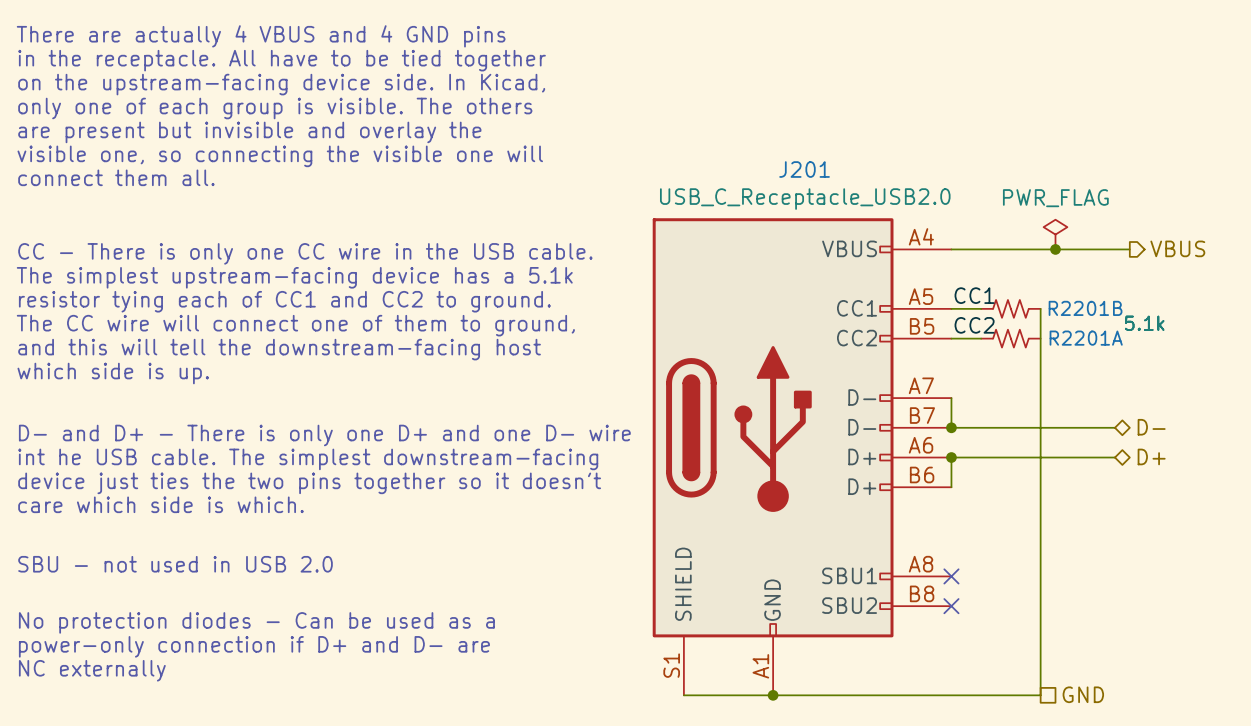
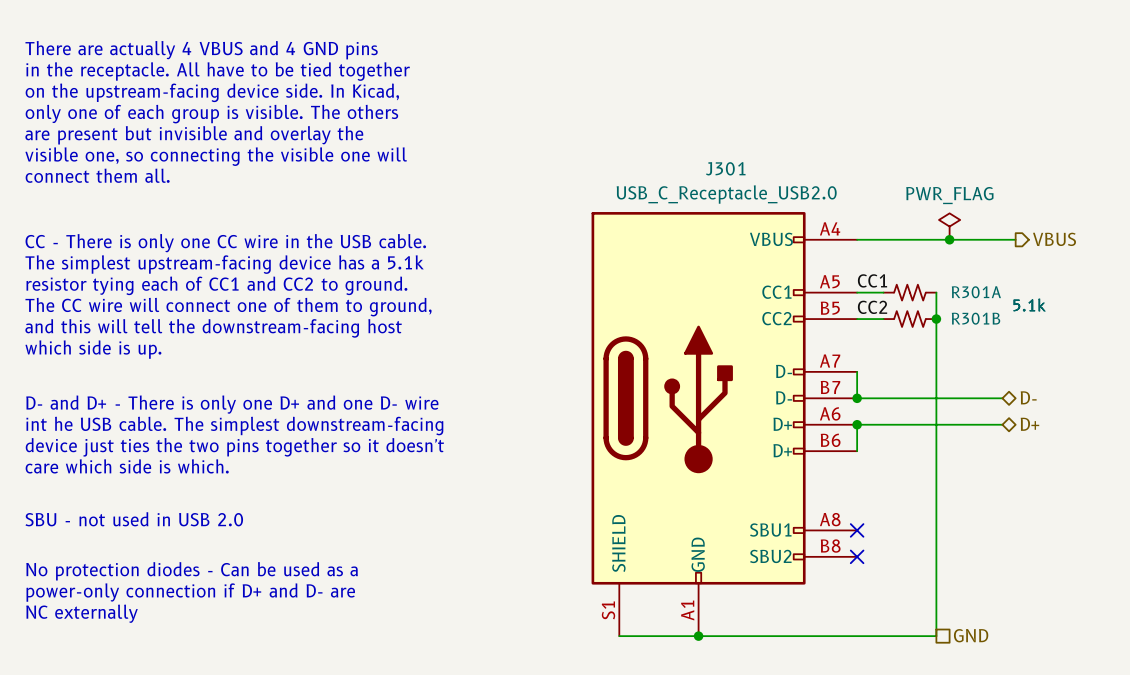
J201 name: J201 (804, 169) -> J301 (725, 168)
R2201B name: R2201B (1085, 308) -> R301A (976, 292)
junction: none -> (936, 319)
R2201A name: R2201A (1086, 338) -> R301B (976, 318)

